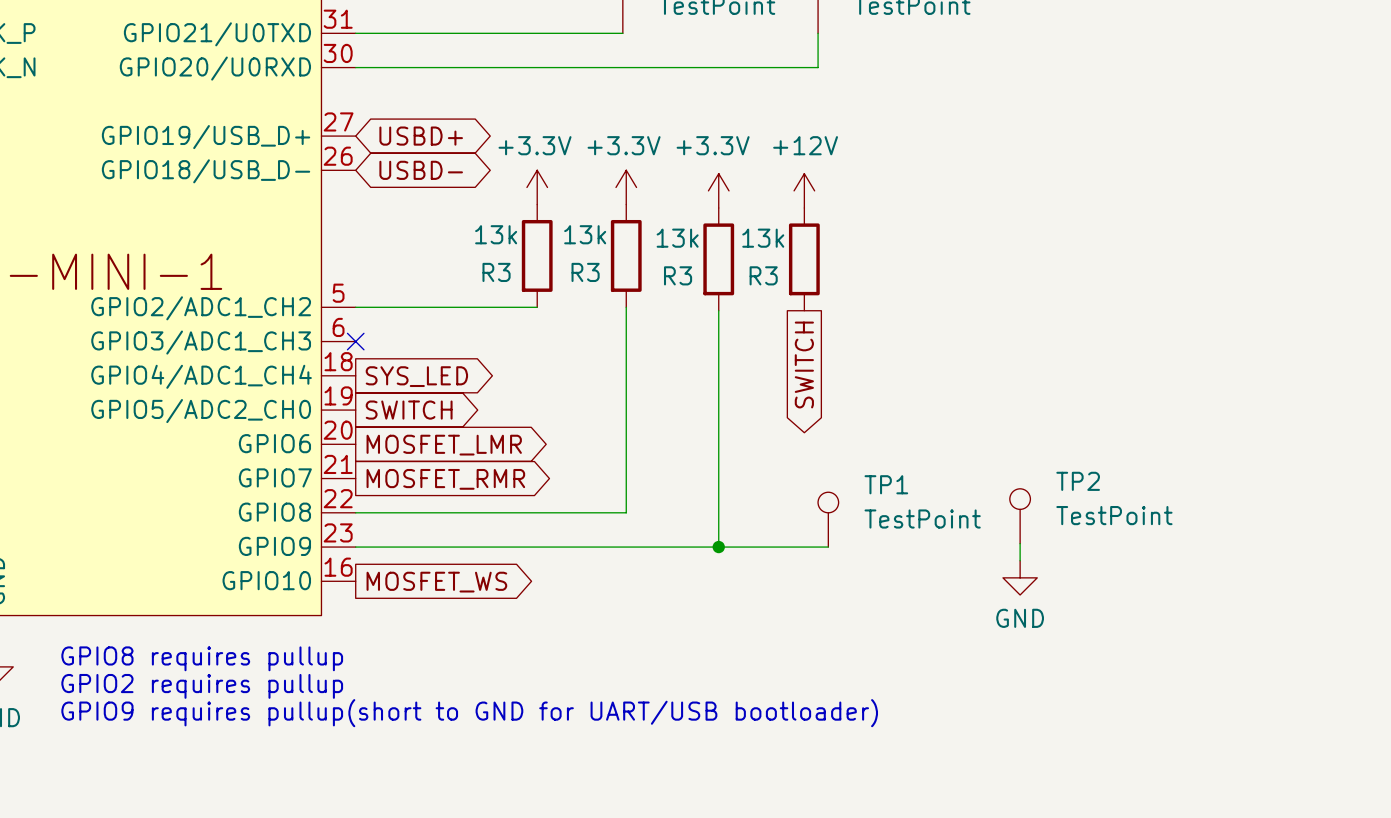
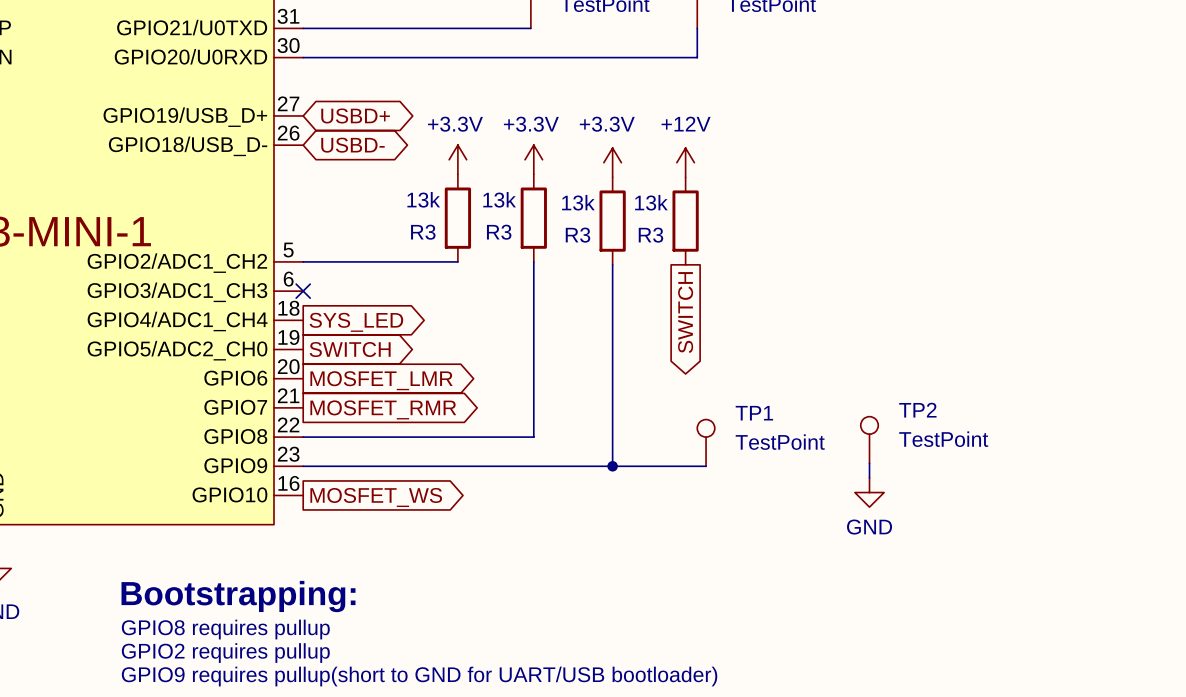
text position: GPIO8 requires pullup (202, 658) -> GPIO8 requires pullup (225, 629)
text position: GPIO2 requires pullup (202, 686) -> GPIO2 requires pullup (225, 653)
text: none -> Bootstrapping: (238, 596)
text position: GPIO9 requires pullup(short to GND for UART/USB bootloader) (469, 713) -> GPIO9 requires pullup(short to GND for UART/USB bootloader) (419, 676)

